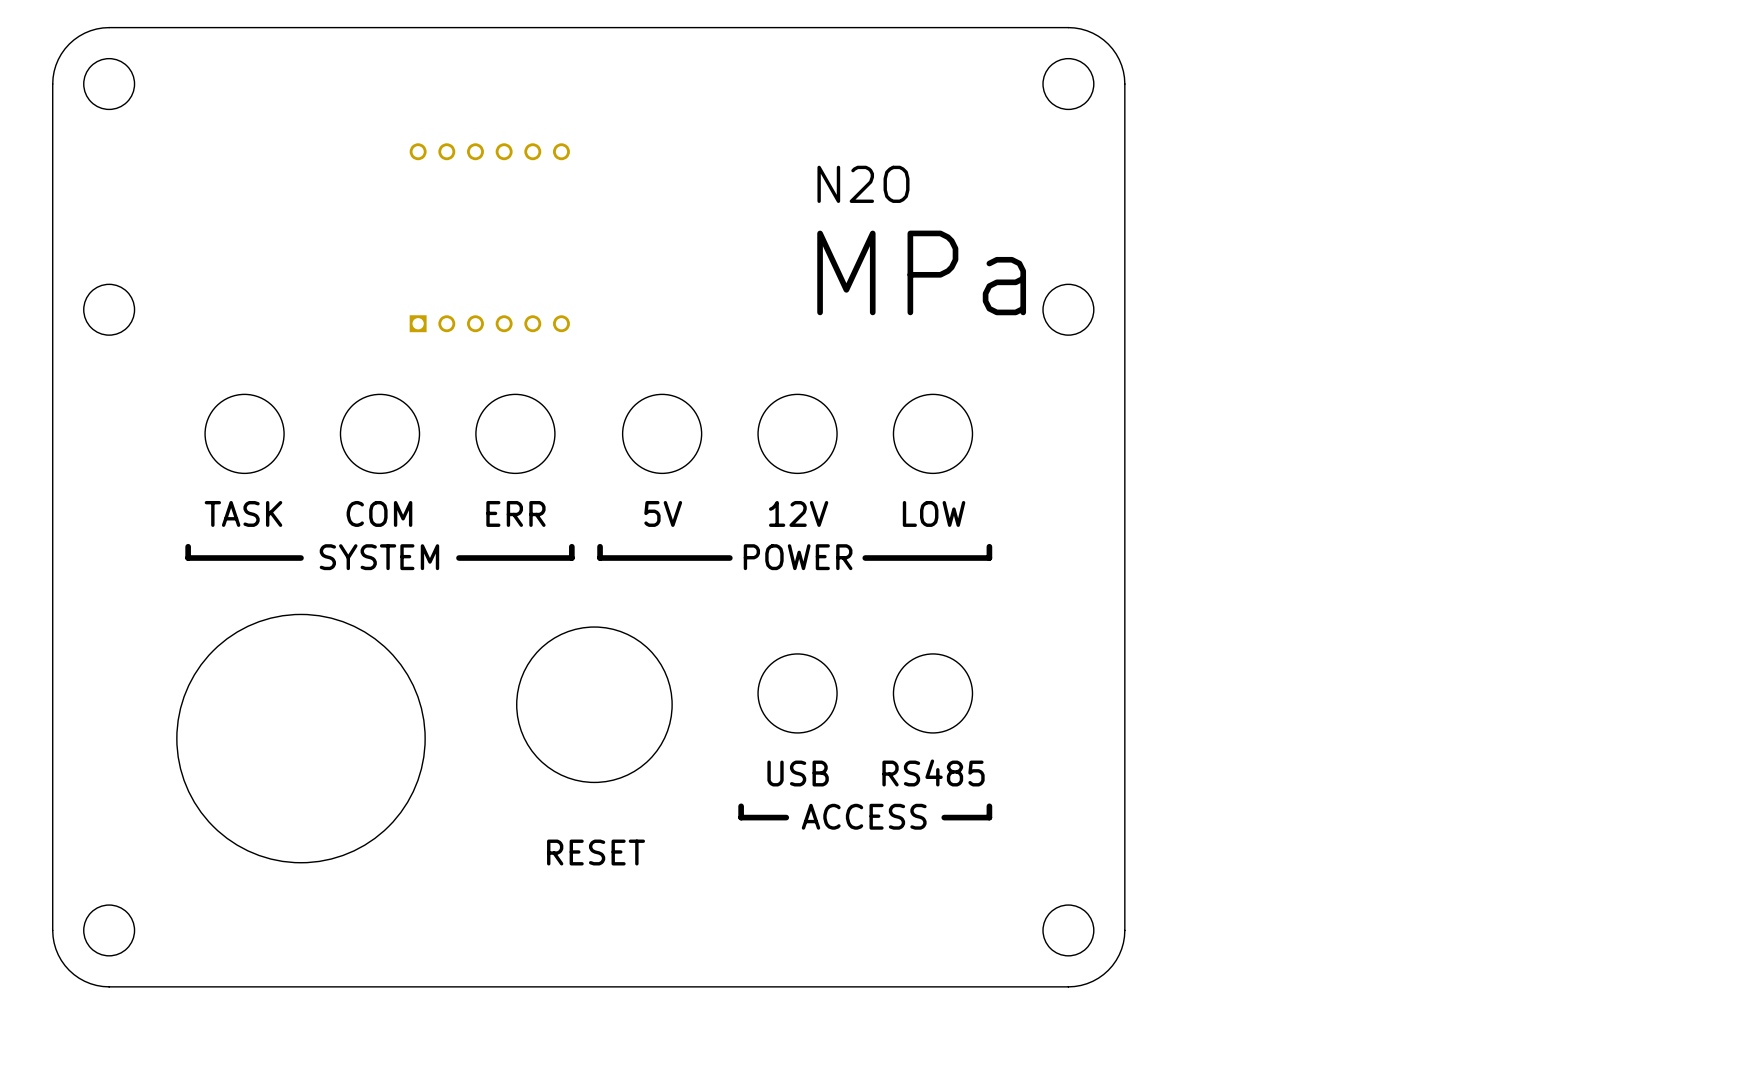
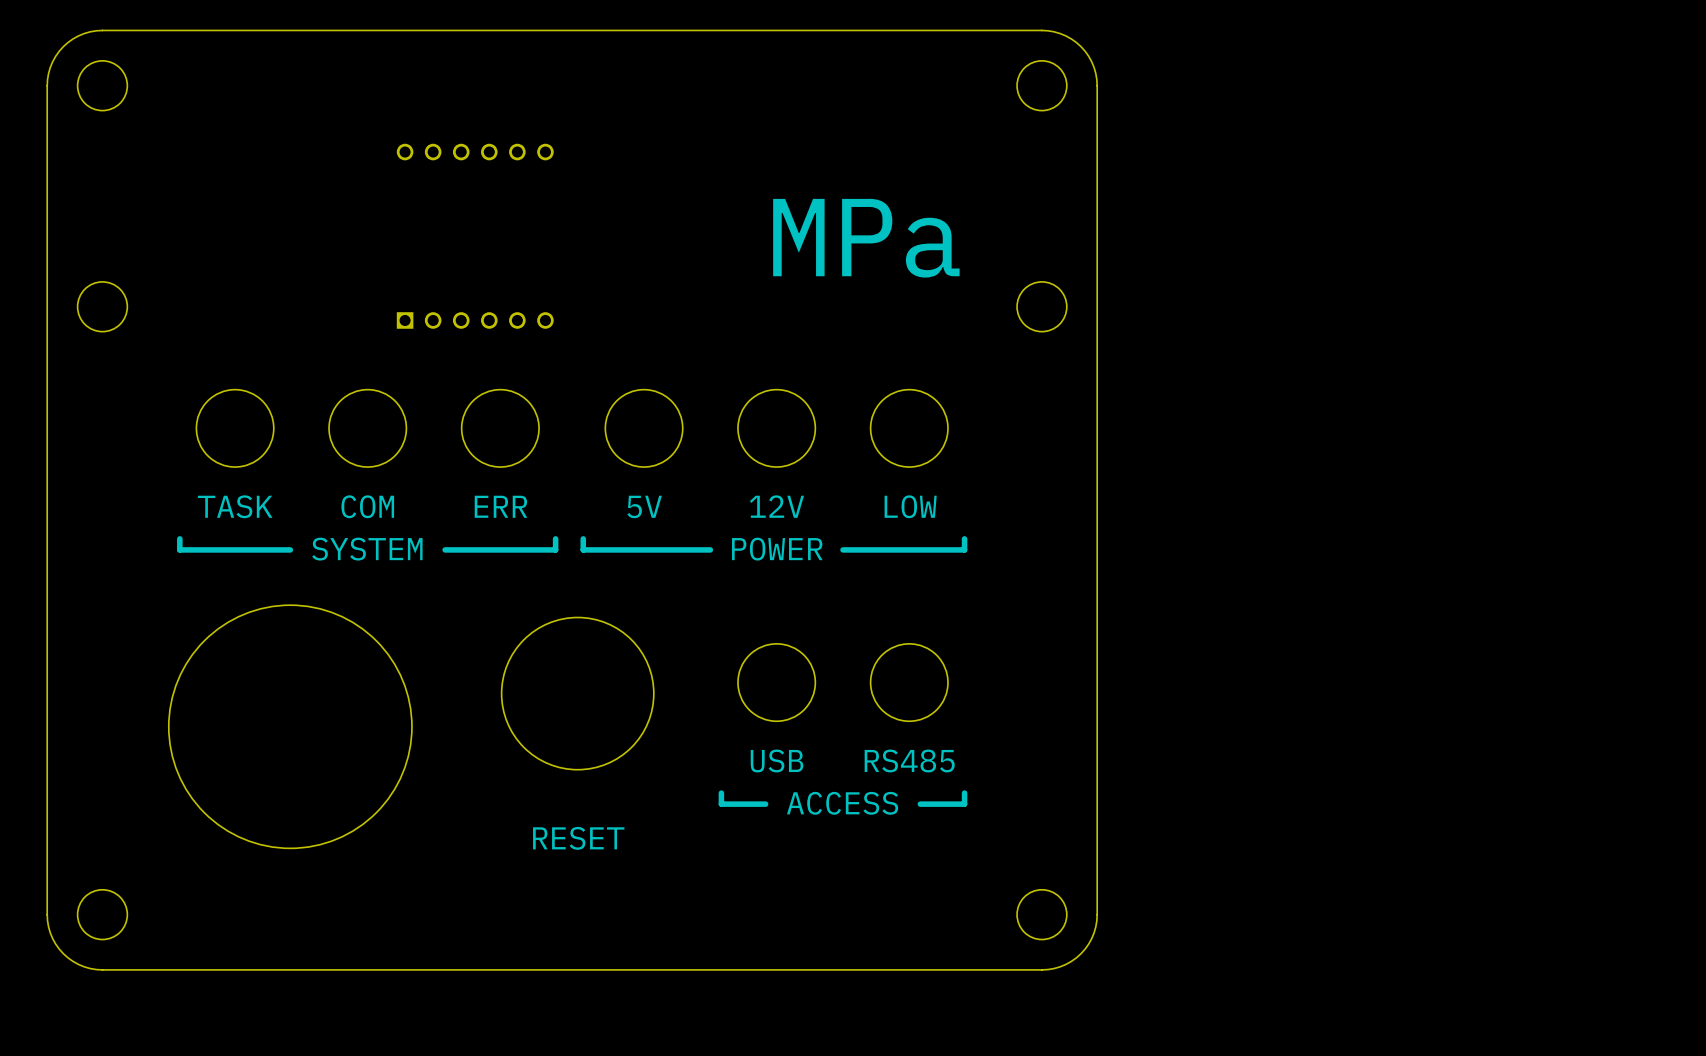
text: N2O (863, 184) -> none
text position: MPa (921, 272) -> MPa (866, 238)

